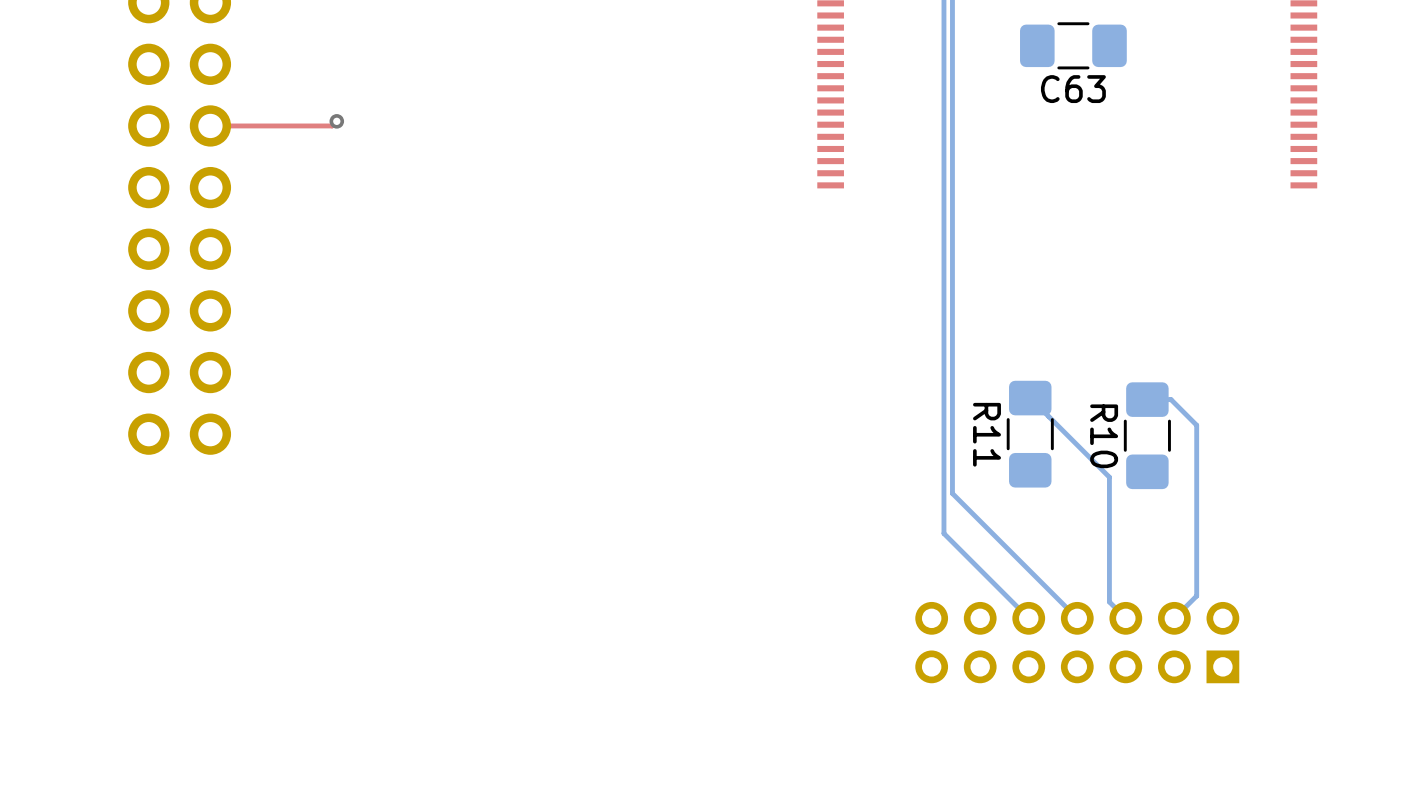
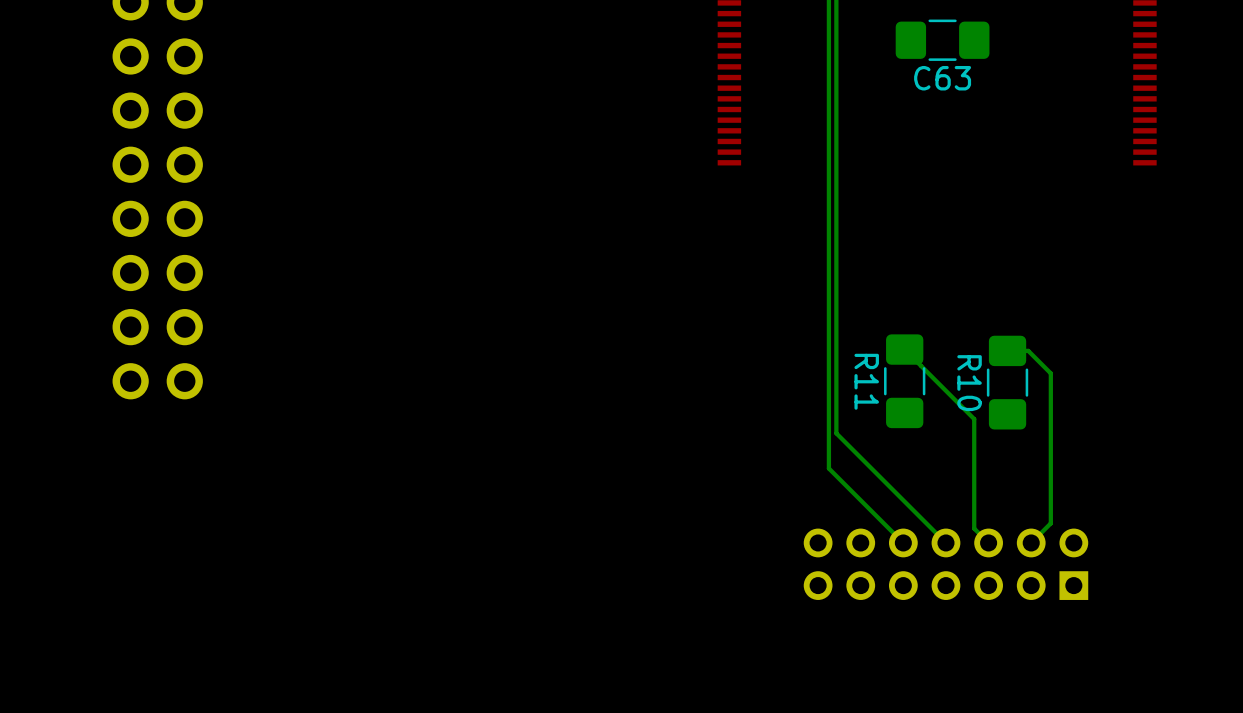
top track: (336, 121) (332, 125) (210, 125) -> none
via: (336, 121) -> none

